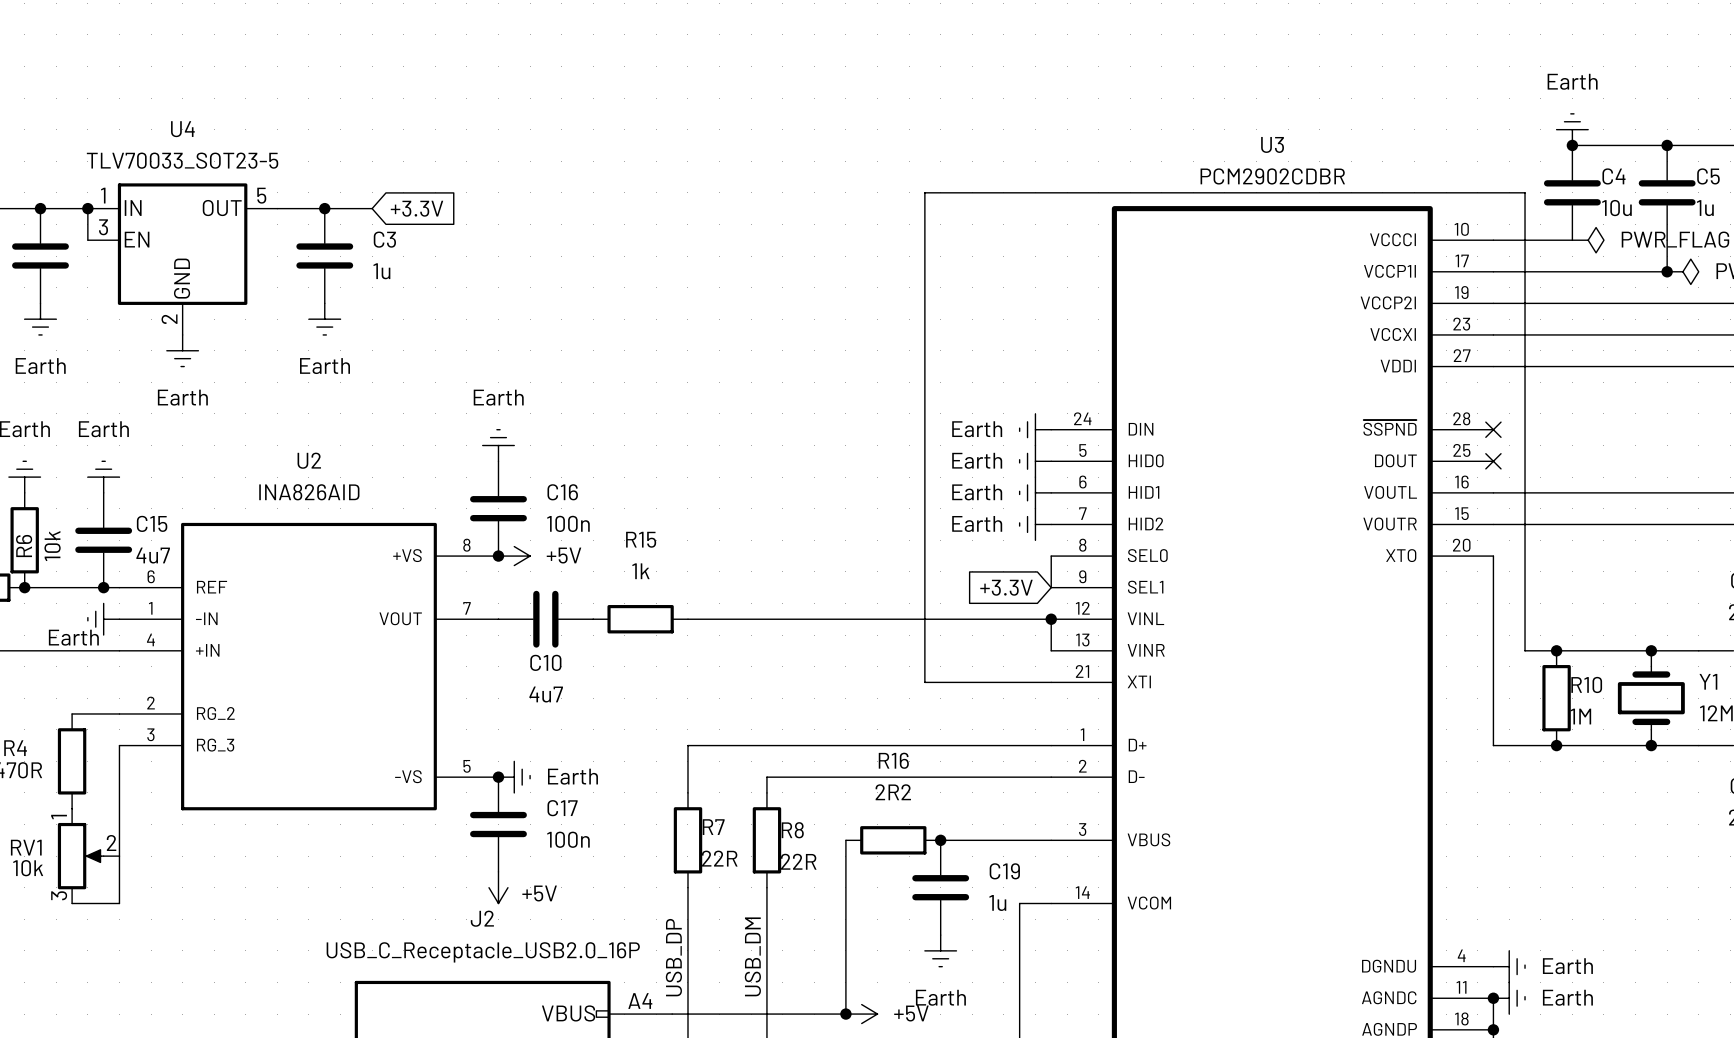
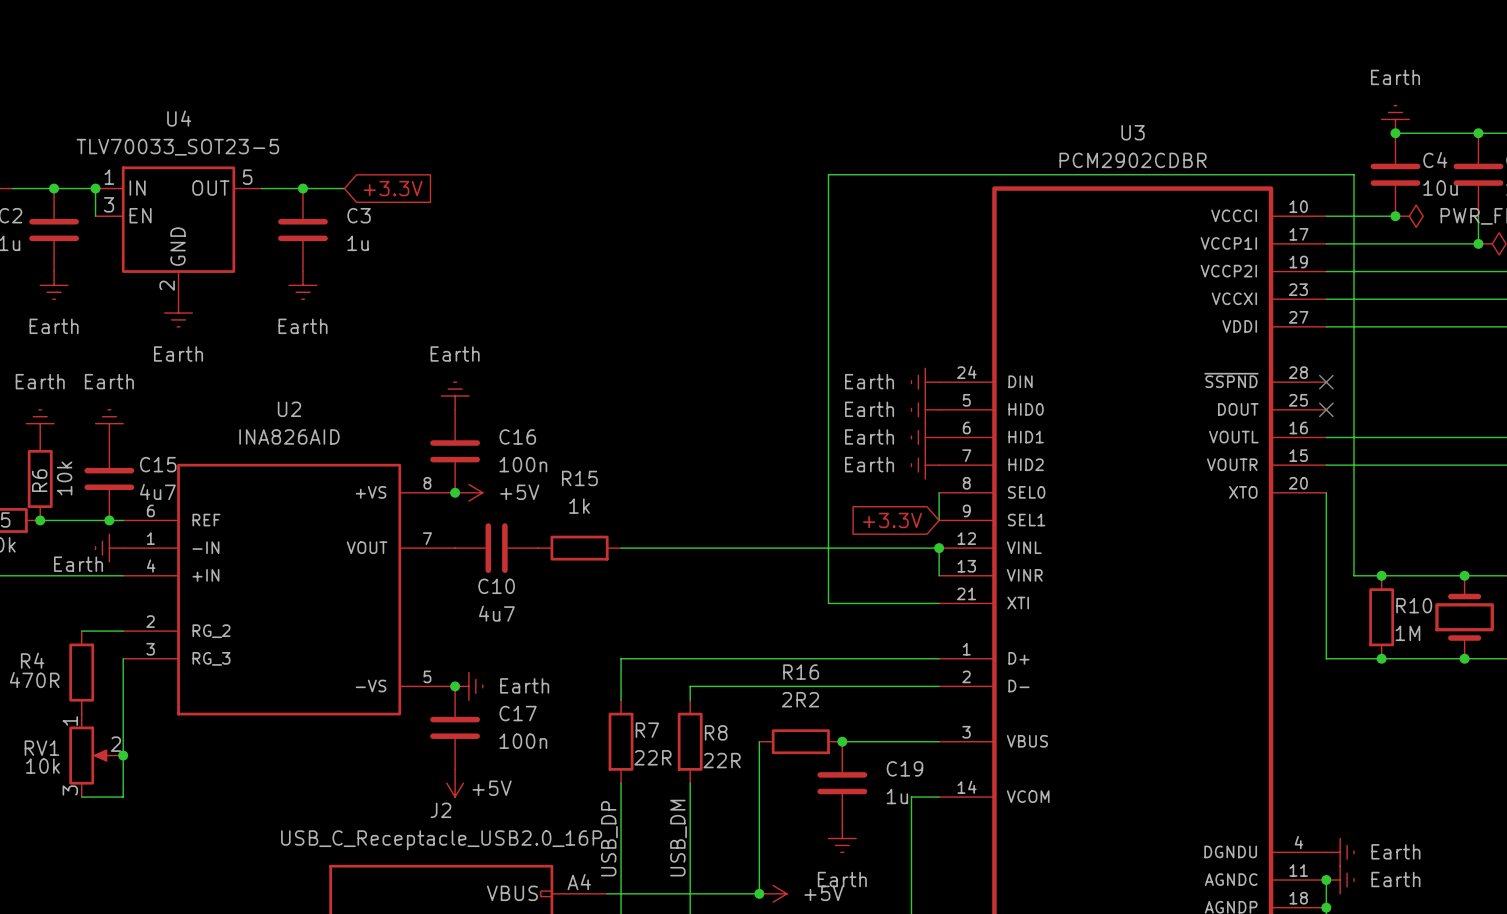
junction: none -> (1395, 216)
junction: none -> (123, 755)

